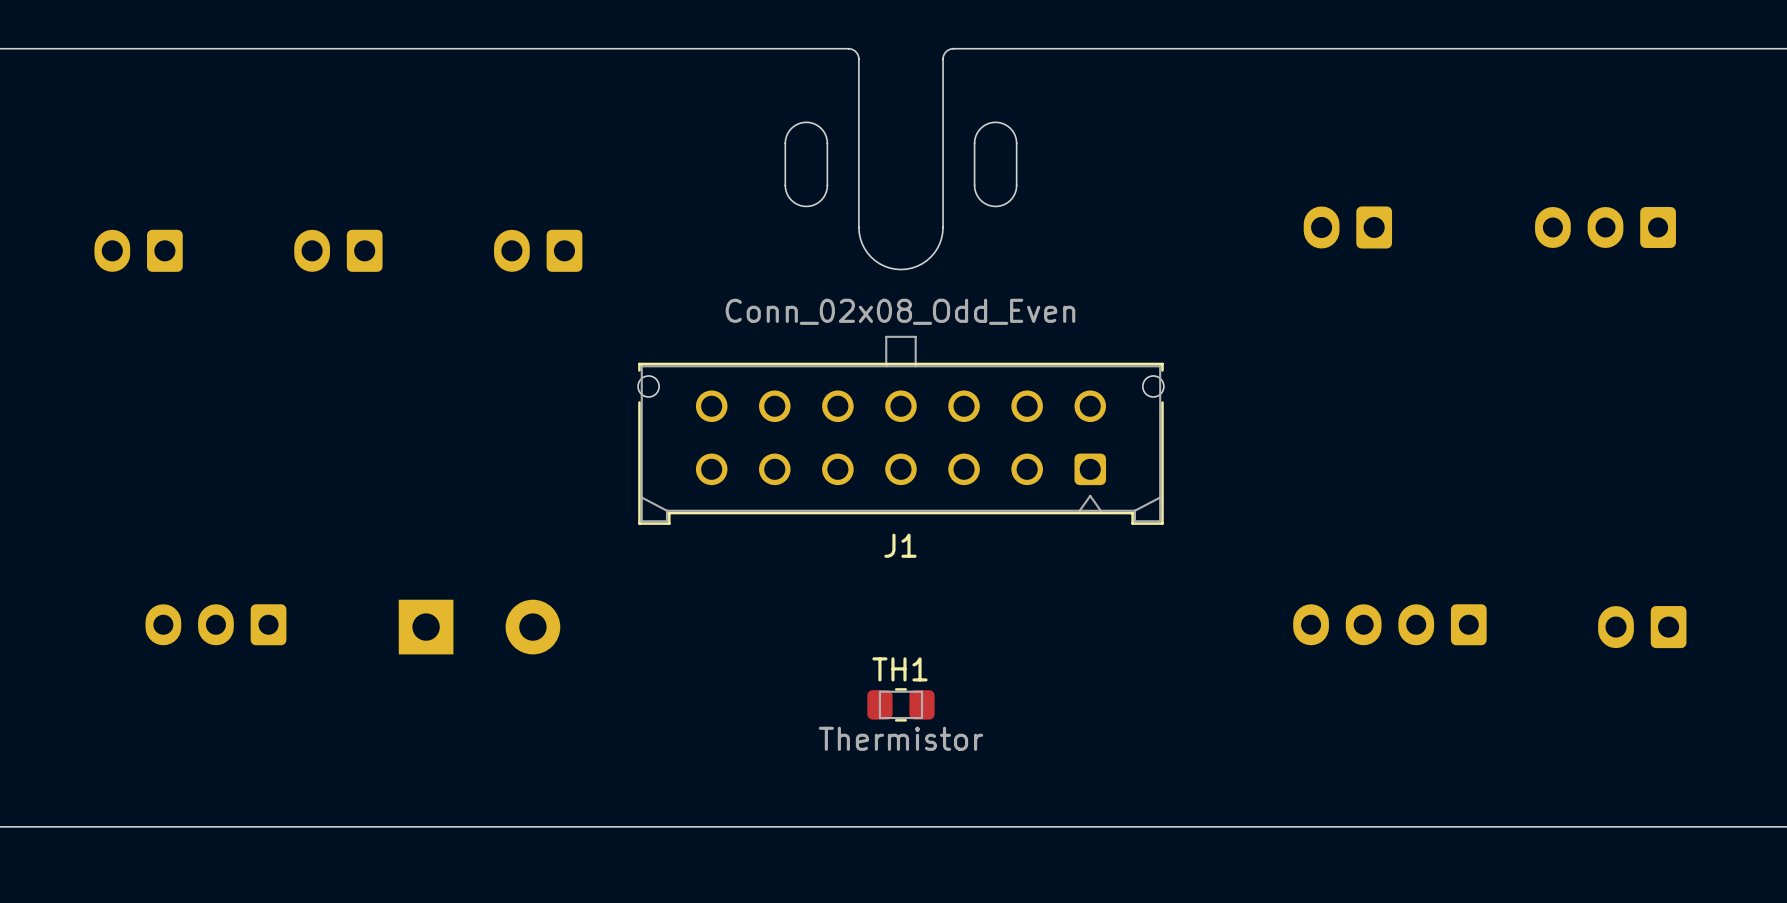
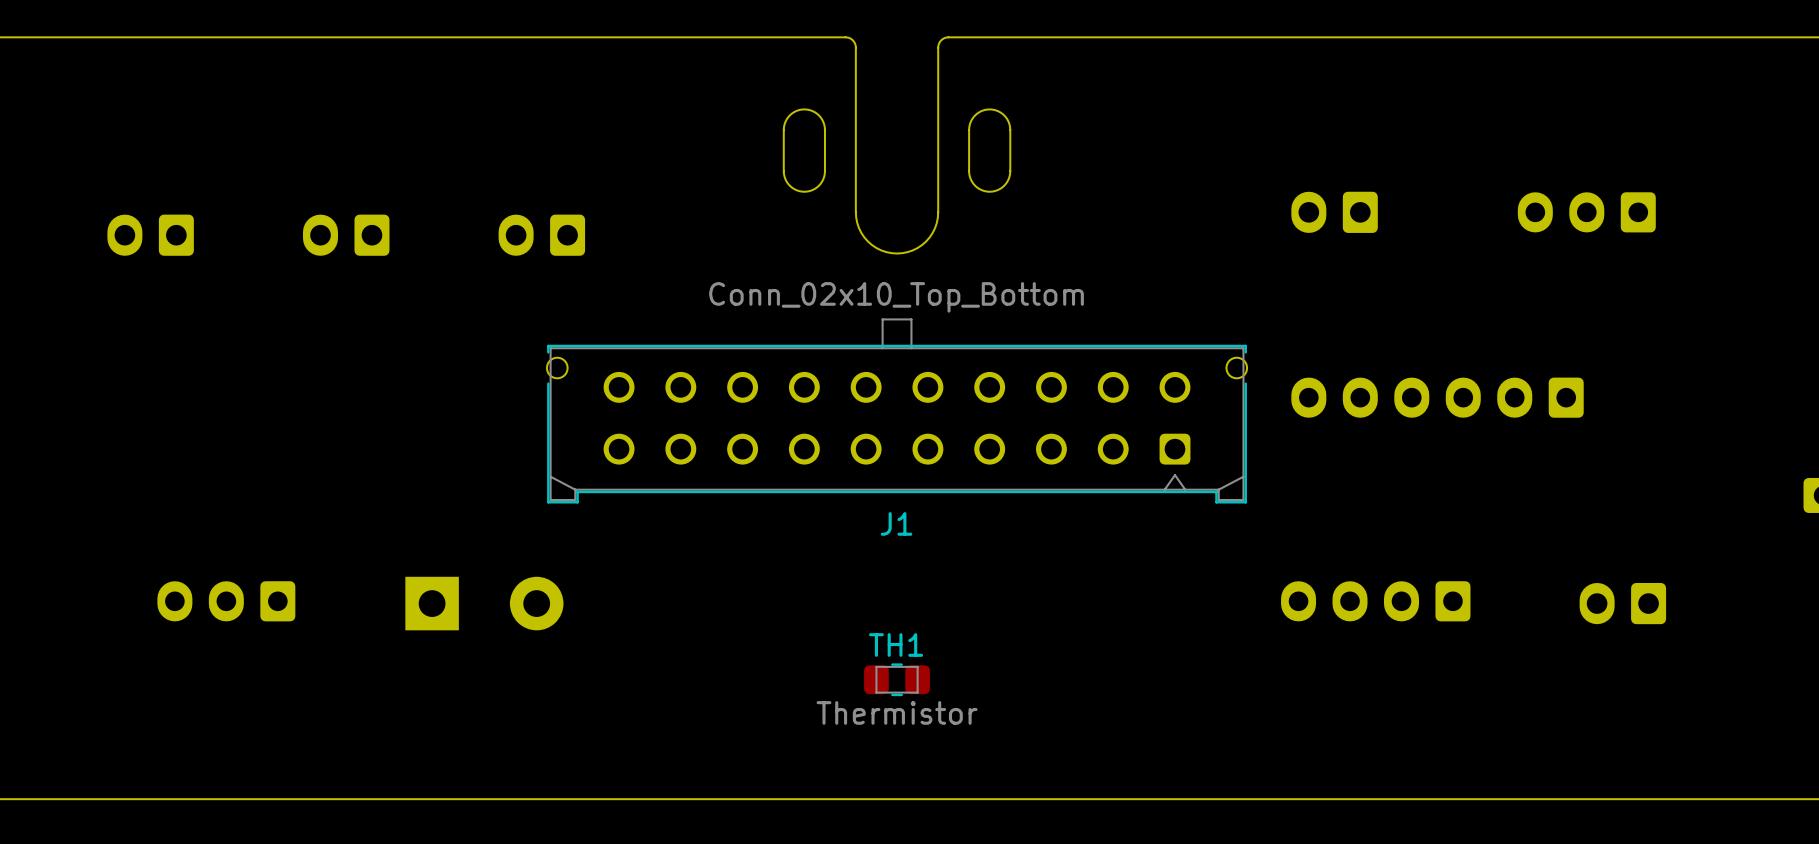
J1 value: Conn_02x08_Odd_Even (900, 311) -> Conn_02x10_Top_Bottom (896, 297)
J1 footprint: [638, 335, 1164, 525] -> [547, 318, 1248, 504]
part: none -> (1437, 397)

